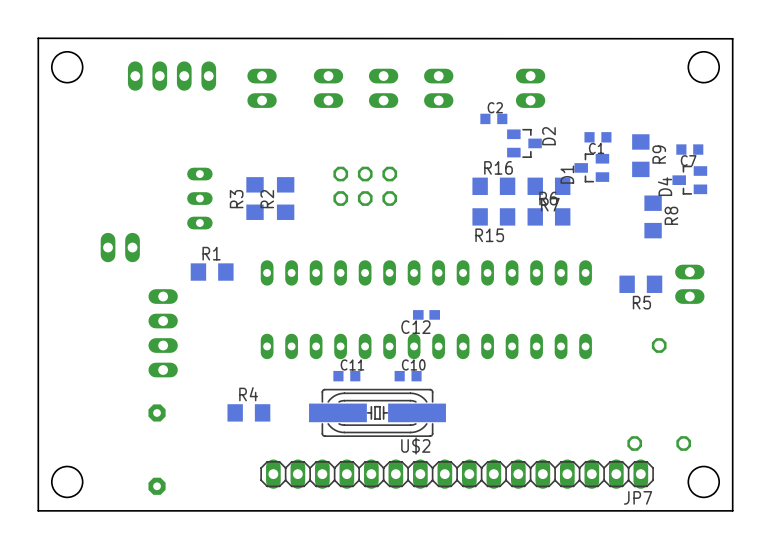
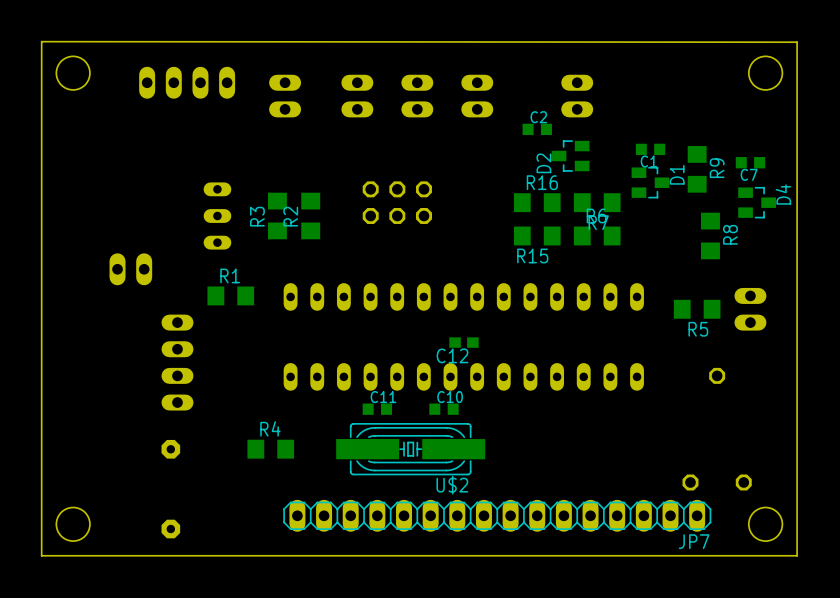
D2 rotation: 0° (524, 143) -> 180° (570, 156)
D1 rotation: 0° (591, 167) -> 180° (650, 182)
D4 rotation: 0° (689, 180) -> 180° (757, 202)

